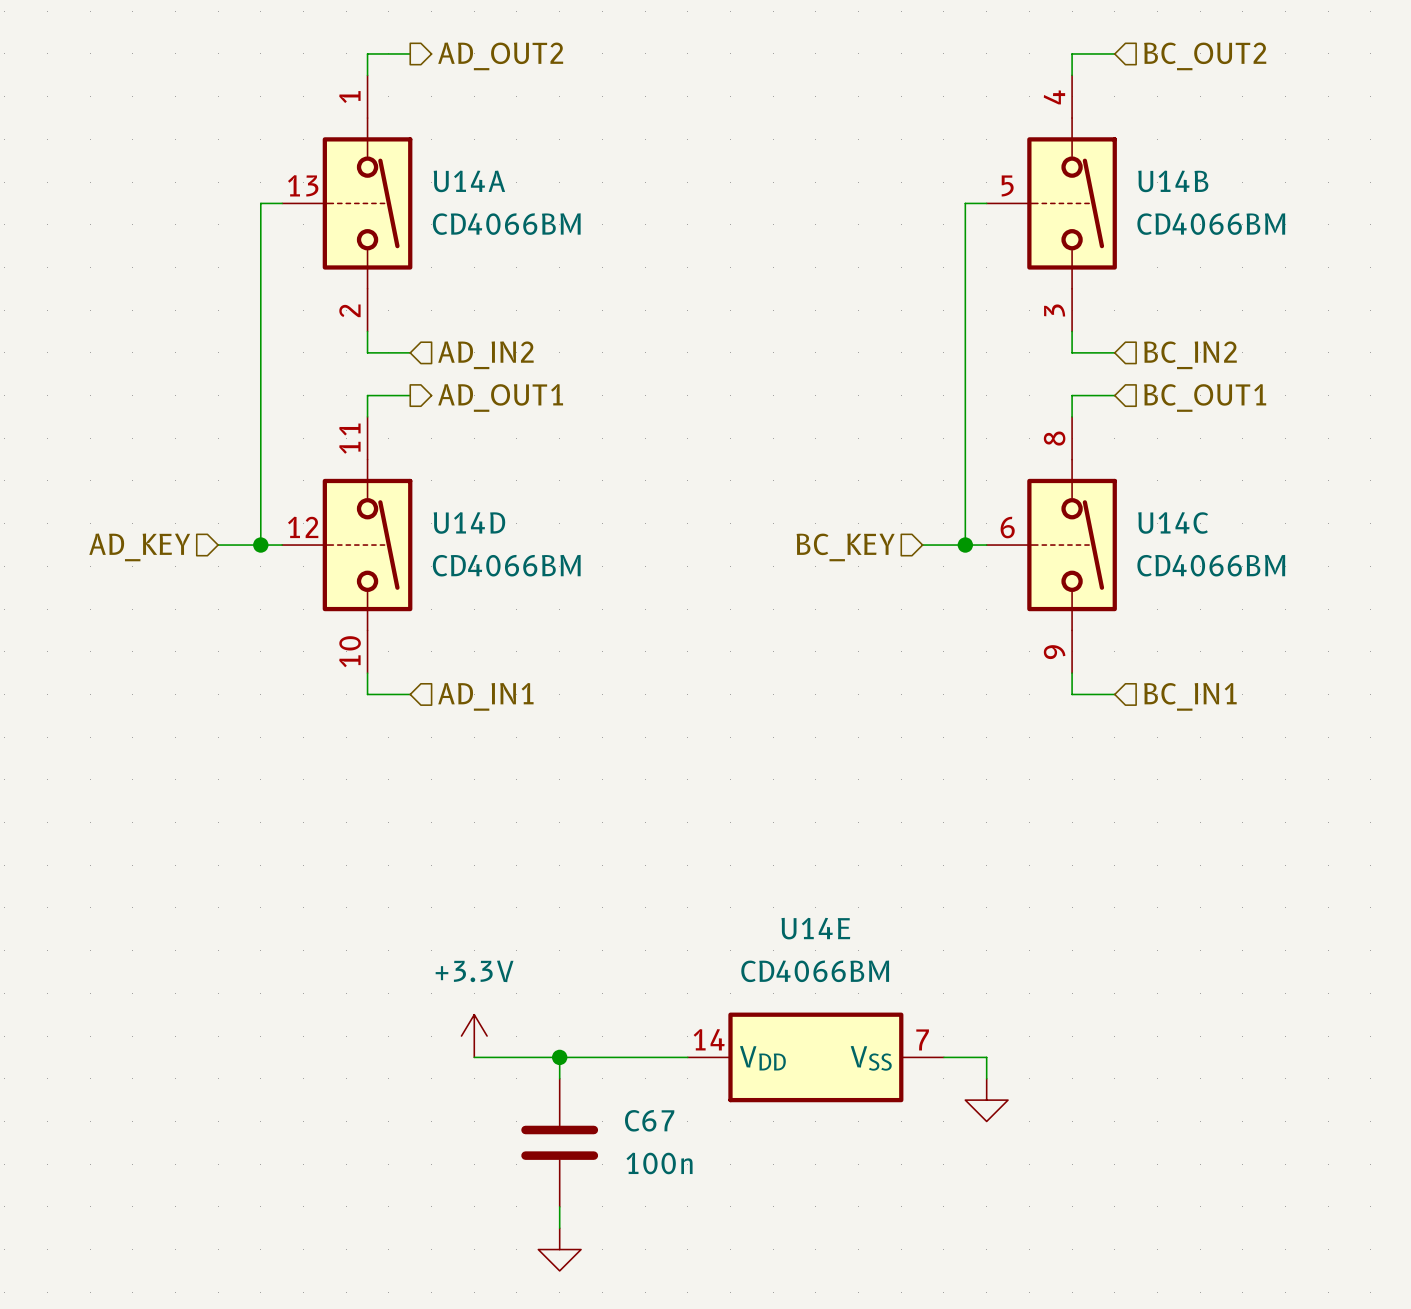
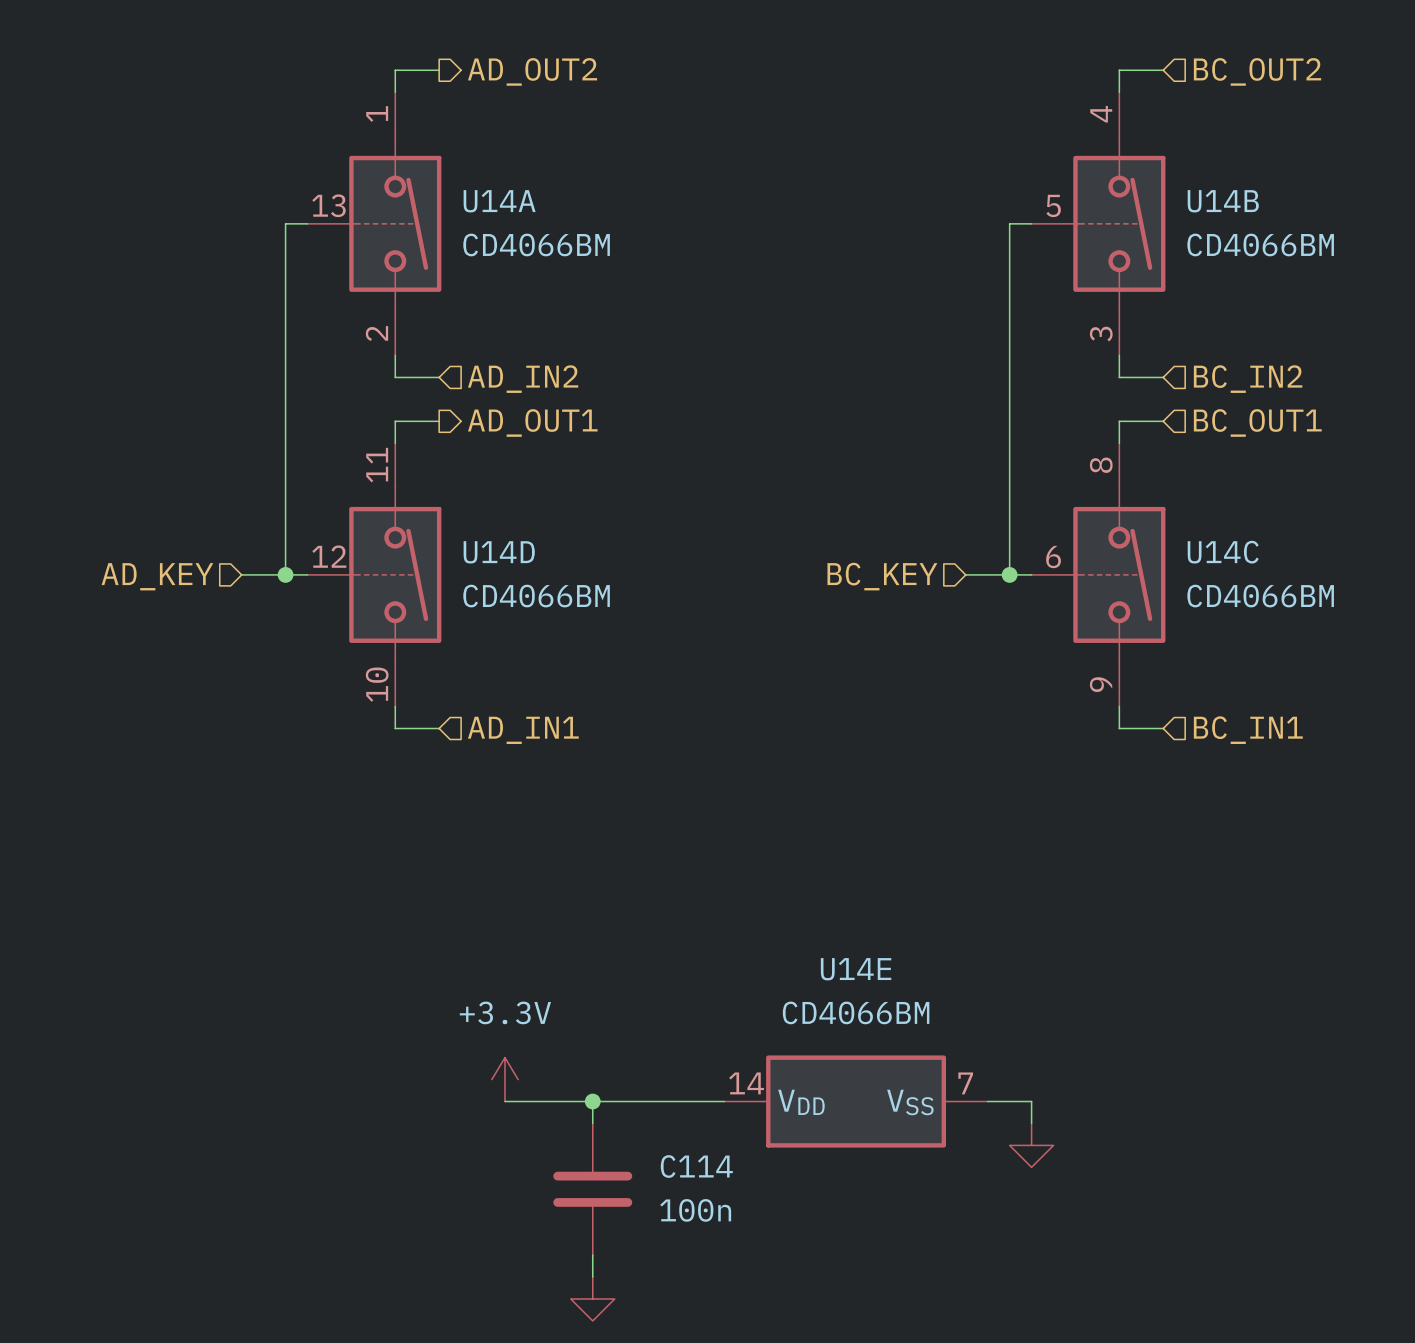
C67 name: C67 (649, 1120) -> C114 (696, 1166)

